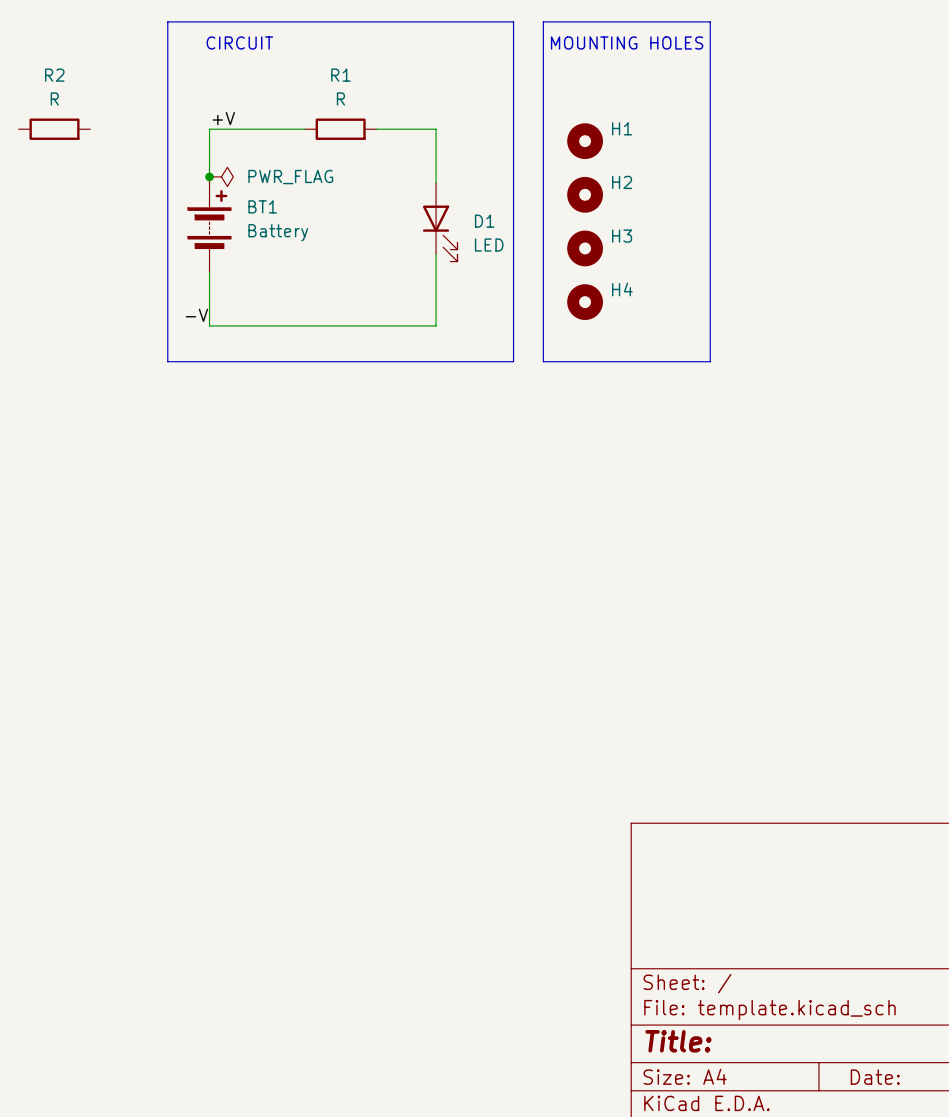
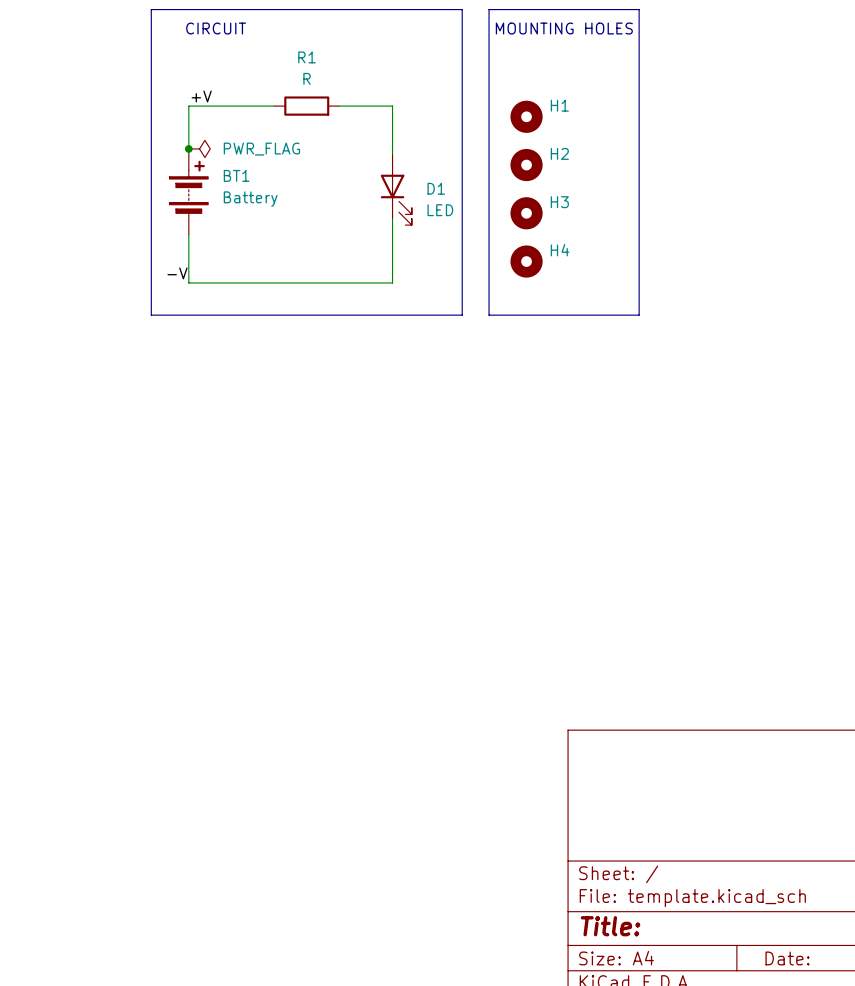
R2: R (54, 129) -> none

